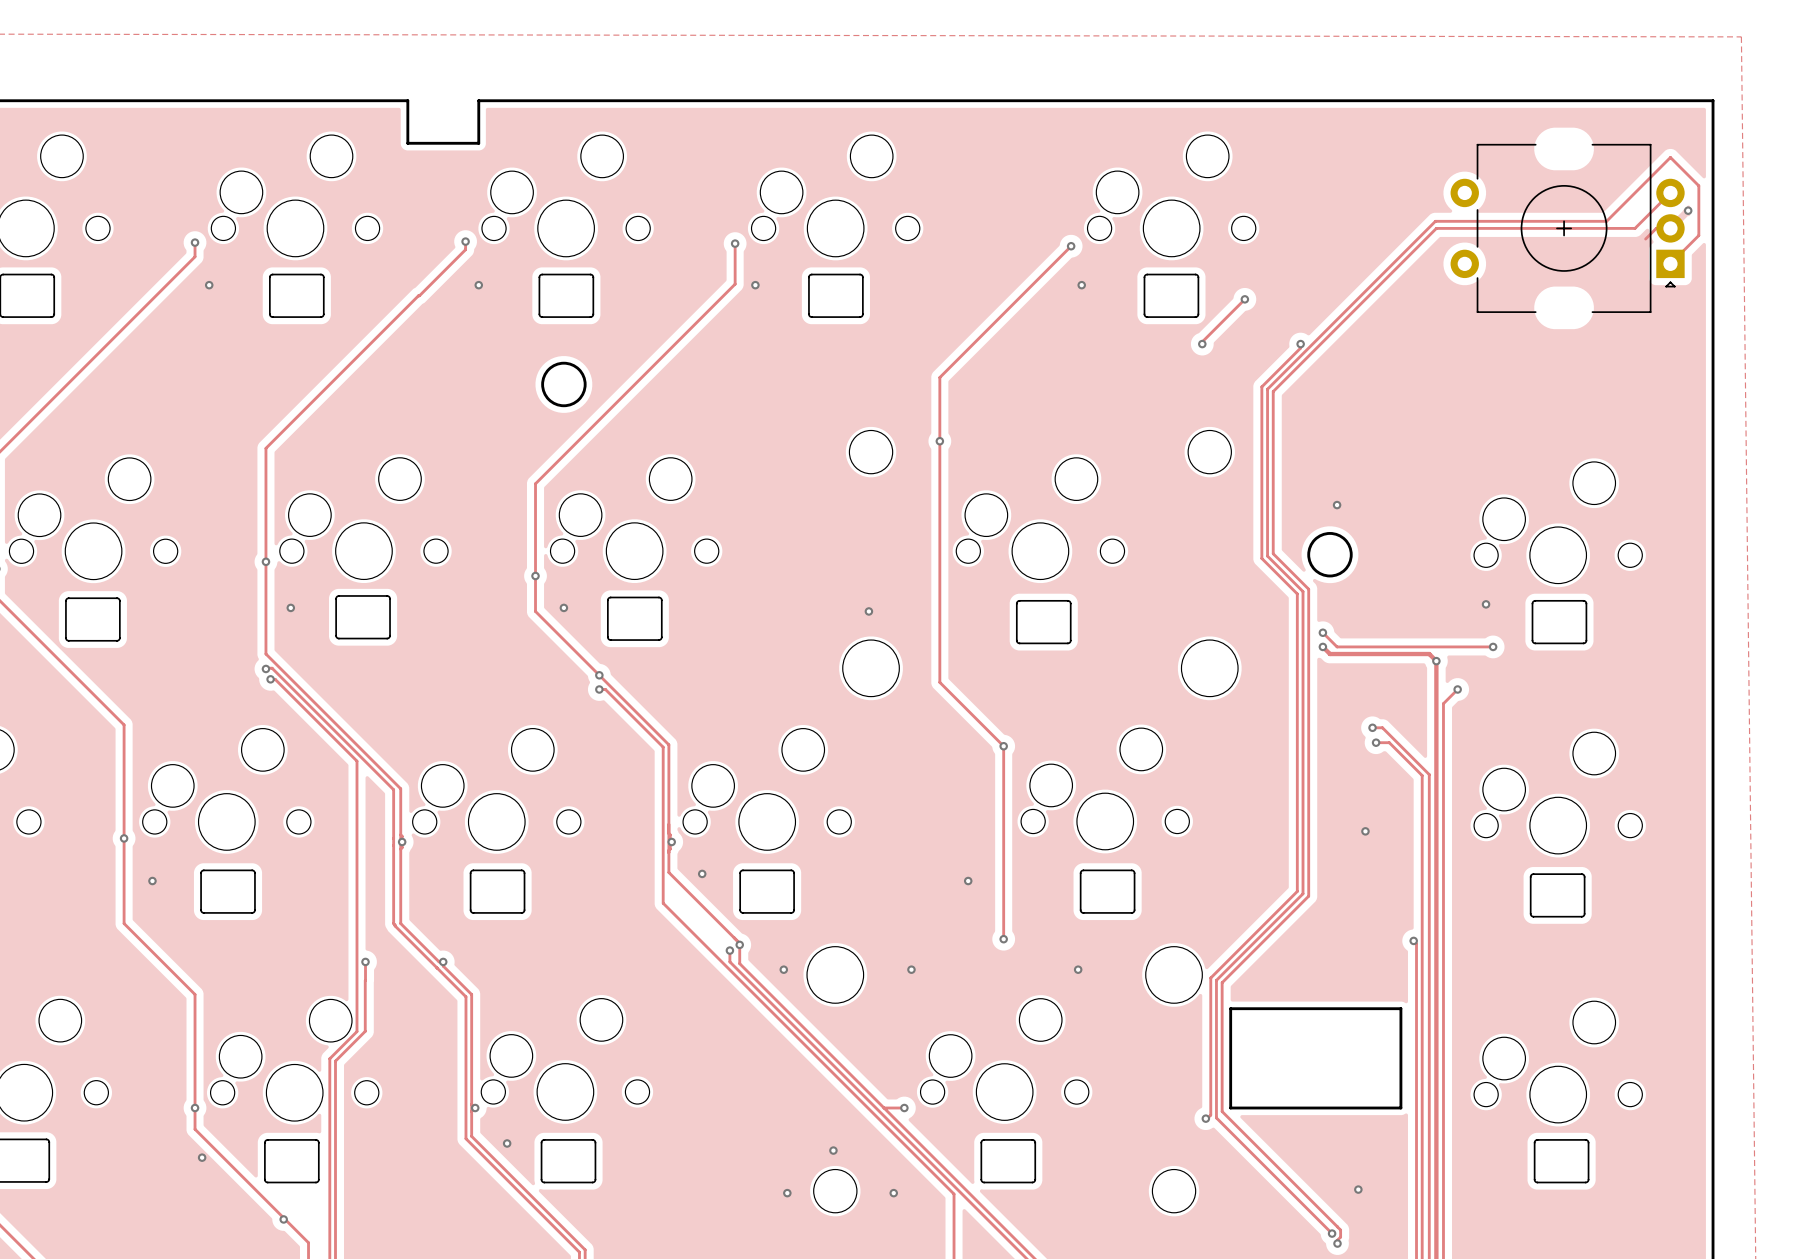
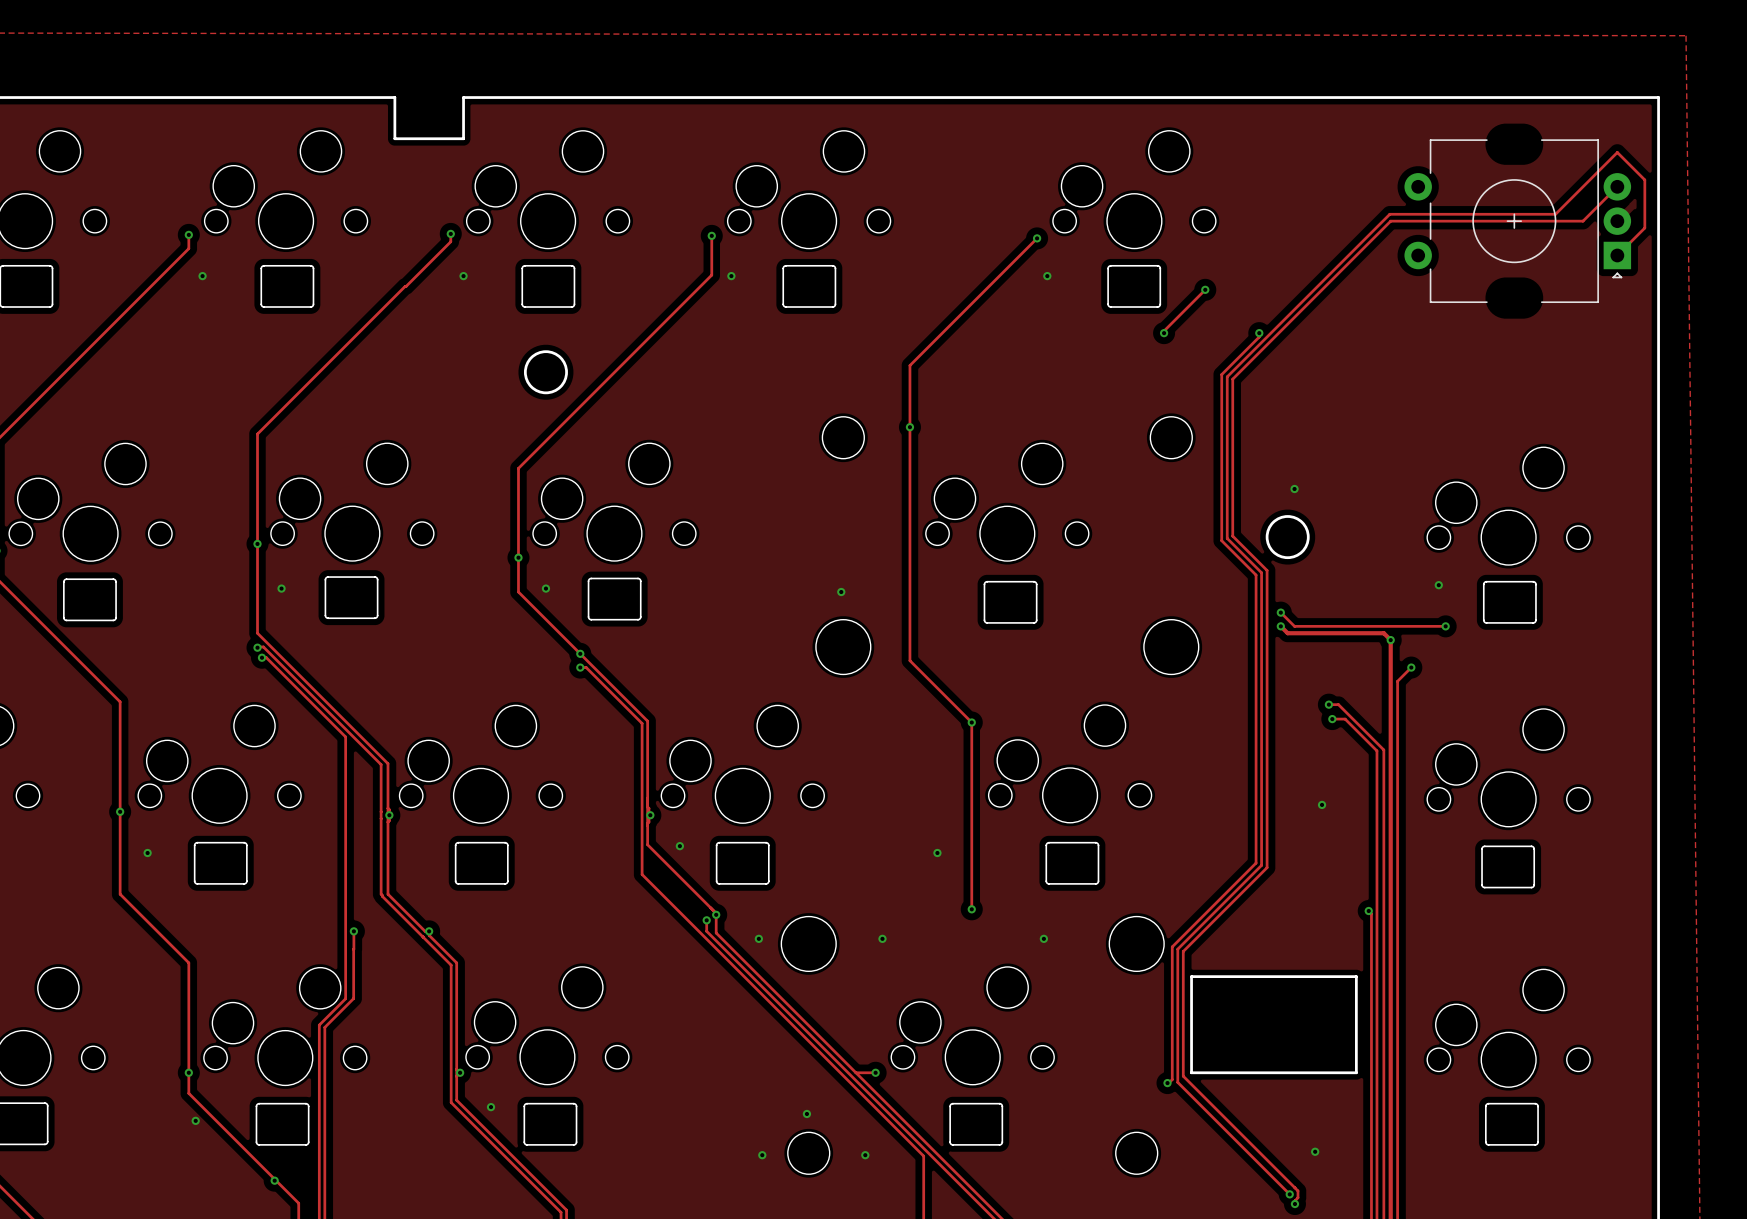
via: (1688, 210) -> none
track: (1670, 228) (1656, 228) (1645, 239) -> none

